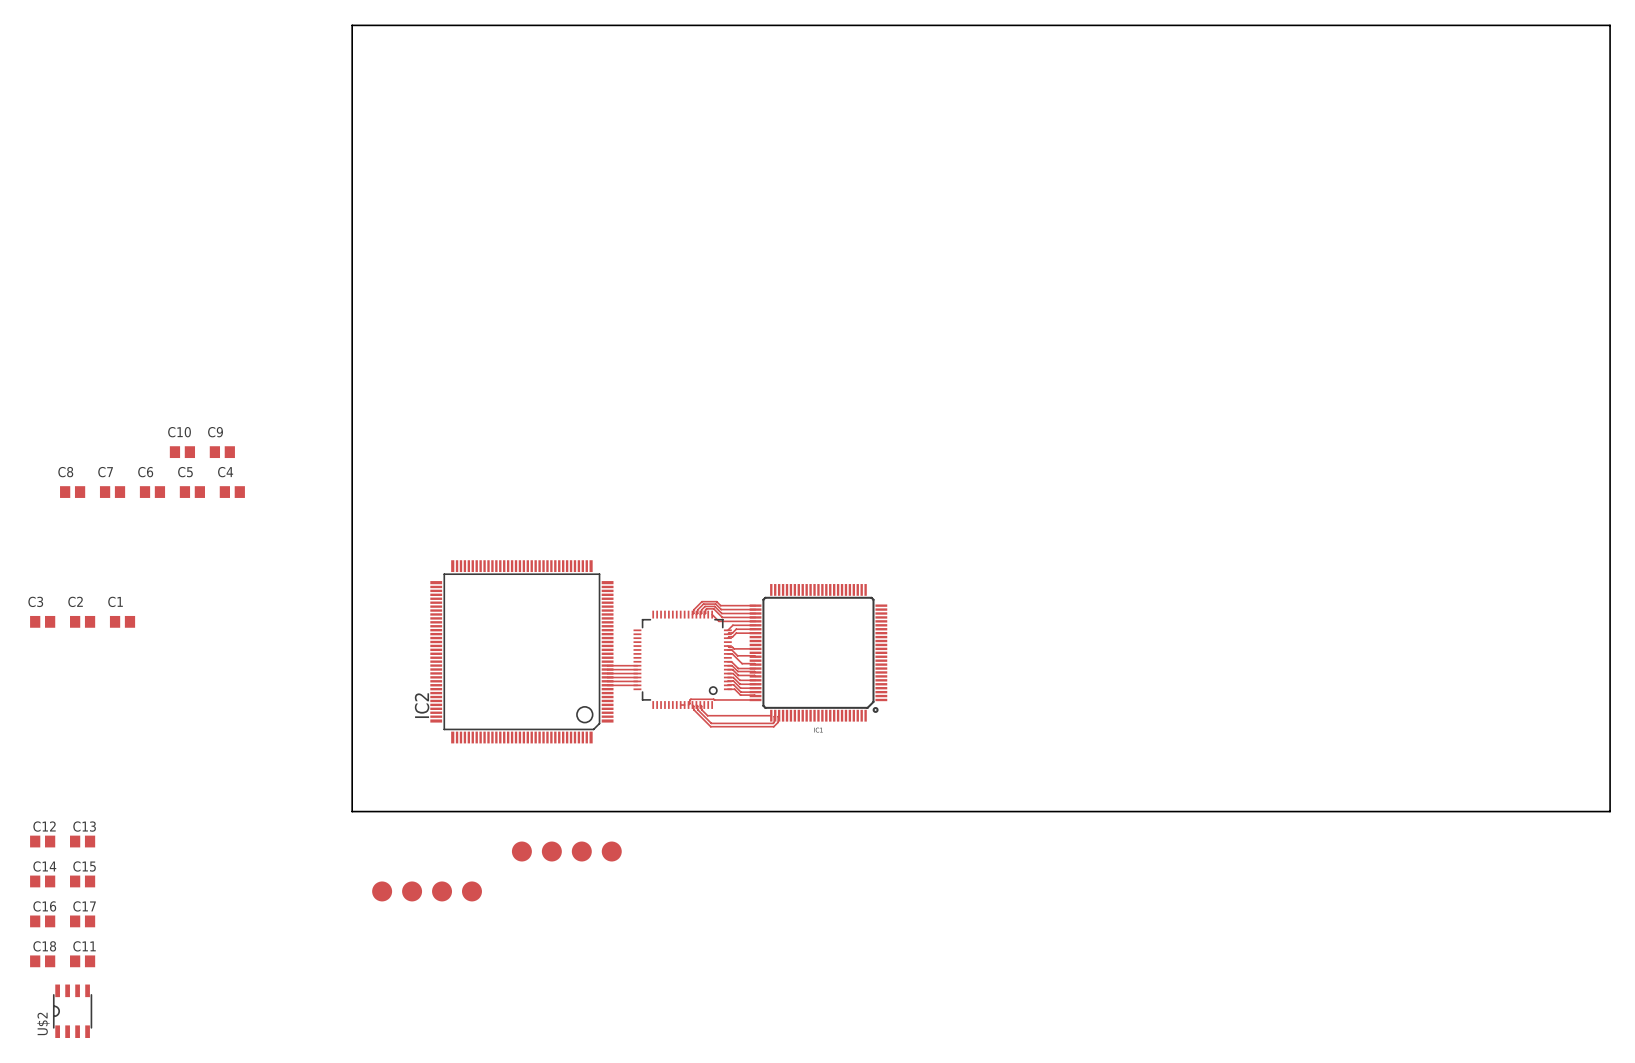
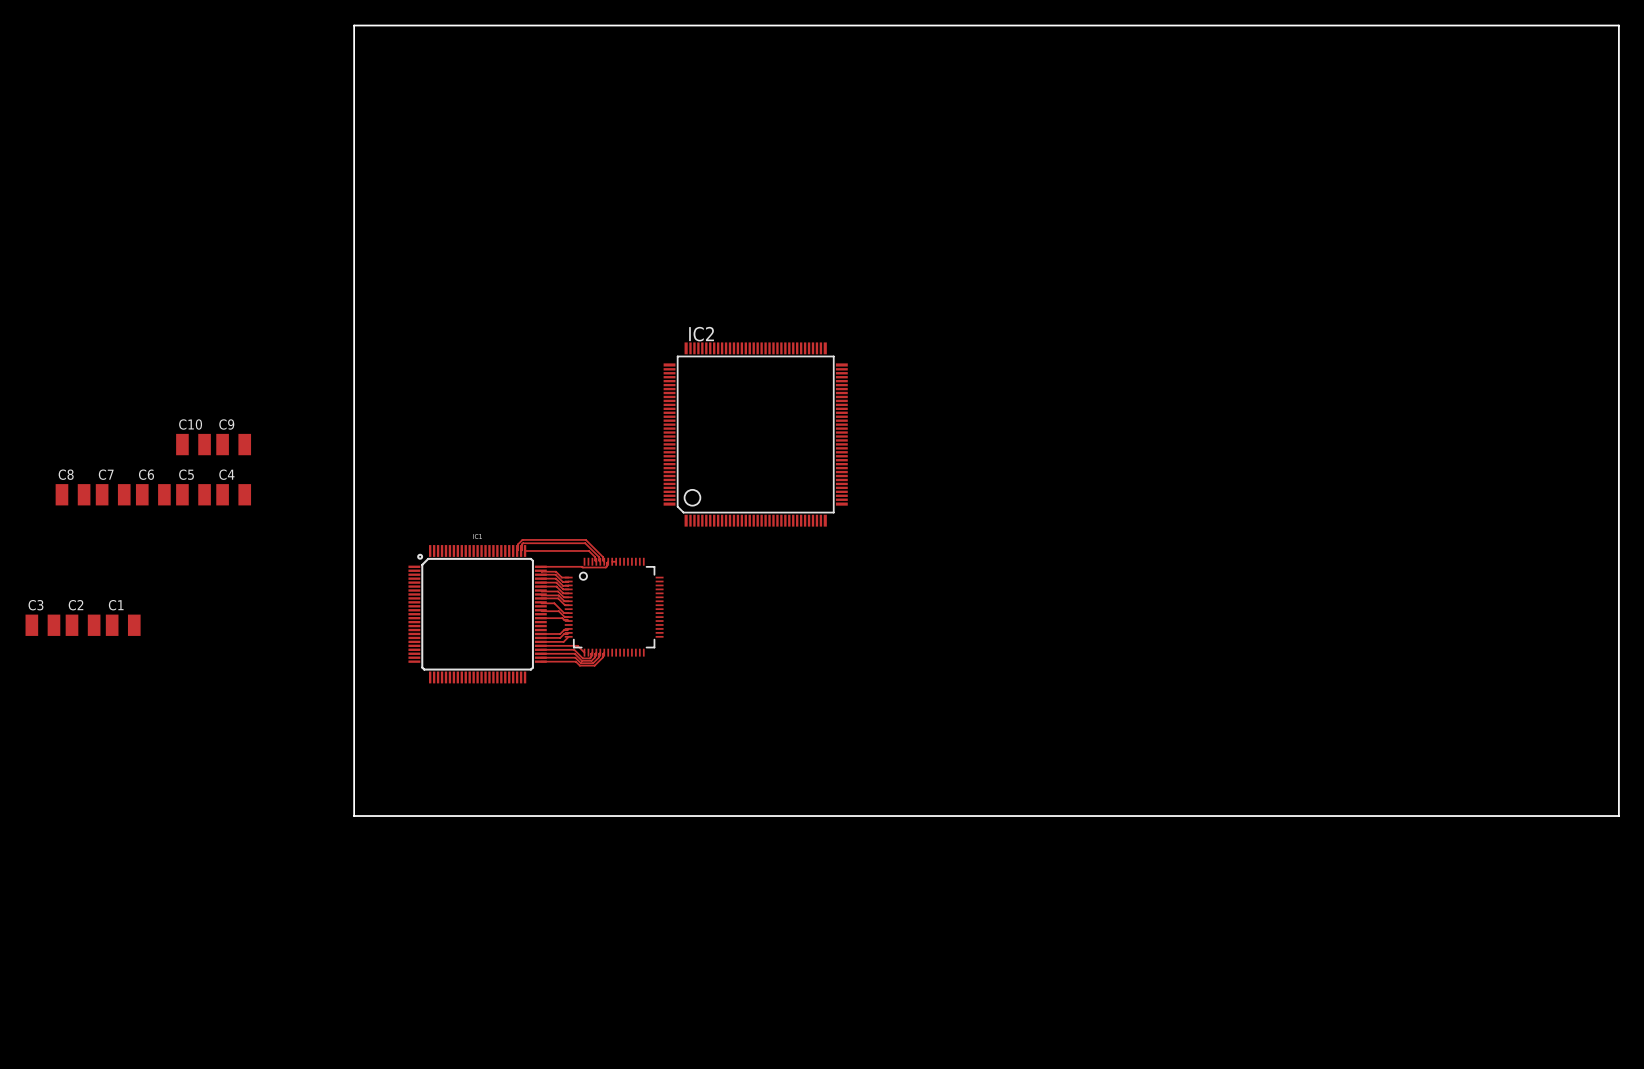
C10 footprint: [169, 446, 196, 459] -> [176, 433, 211, 456]
C9 footprint: [209, 446, 235, 459] -> [216, 433, 252, 456]
C8 footprint: [60, 486, 86, 498] -> [55, 484, 91, 506]
C7 footprint: [99, 486, 126, 498] -> [95, 484, 131, 506]
C6 footprint: [139, 486, 166, 498] -> [135, 484, 171, 506]
C5 footprint: [179, 486, 205, 498] -> [176, 484, 211, 506]
C4 footprint: [219, 486, 245, 498] -> [216, 484, 252, 506]
top track: none -> (517, 550) (518, 544) (522, 539) (585, 539) (602, 557) (604, 561)
top track: none -> (521, 550) (523, 543) (585, 543) (599, 557) (600, 561)
top track: none -> (525, 550) (589, 550) (595, 557) (596, 561)
top track: none -> (608, 561) (605, 567) (540, 566)
top track: none -> (540, 570) (555, 571) (561, 577) (568, 577)
top track: none -> (540, 574) (555, 574) (562, 582) (568, 581)
top track: none -> (540, 578) (555, 578) (563, 585) (568, 585)
top track: none -> (540, 582) (556, 582) (563, 589) (568, 589)
top track: none -> (540, 586) (556, 586) (563, 593) (568, 593)
top track: none -> (540, 590) (558, 591) (563, 597) (568, 597)
top track: none -> (540, 594) (558, 595) (564, 601) (568, 601)
top track: none -> (540, 598) (558, 598) (564, 605) (568, 605)
top track: none -> (540, 602) (554, 603) (564, 613) (568, 613)
top track: (755, 605) (720, 605) (716, 601) (702, 601) (693, 609) (692, 614) -> none
top track: none -> (540, 610) (558, 611) (564, 617) (568, 617)
top track: (755, 609) (721, 609) (715, 604) (703, 604) (697, 609) (696, 614) -> none
top track: (755, 613) (721, 613) (714, 606) (705, 606) (700, 614) -> none
top track: none -> (540, 618) (562, 618) (568, 621)
top track: (704, 614) (706, 608) (713, 608) (722, 617) (755, 617) -> none
top track: (712, 614) (718, 621) (755, 621) -> none
C3 footprint: [30, 615, 56, 628] -> [25, 614, 61, 636]
C2 footprint: [70, 615, 96, 628] -> [65, 614, 101, 636]
C1 footprint: [109, 615, 136, 628] -> [105, 614, 141, 636]
top track: none -> (568, 628) (560, 633) (540, 633)
top track: (755, 625) (732, 625) (727, 630) -> none
top track: none -> (568, 632) (560, 637) (540, 637)
top track: (755, 629) (736, 629) (727, 634) -> none
top track: none -> (568, 636) (563, 641) (540, 641)
top track: (755, 633) (736, 633) (727, 638) -> none
top track: none -> (540, 645) (577, 645) (584, 652)
top track: none -> (540, 649) (574, 649) (582, 658) (590, 658) (592, 652)
top track: (727, 646) (734, 648) (755, 648) -> none
top track: none -> (596, 652) (591, 660) (581, 660) (574, 653) (540, 653)
top track: none -> (600, 652) (599, 657) (593, 663) (580, 663) (575, 657) (540, 657)
top track: none -> (604, 652) (602, 657) (594, 665) (579, 665) (575, 661) (540, 661)
top track: (727, 649) (731, 649) (737, 655) (755, 656) -> none
IC2 rotation: 0° (521, 651) -> 90° clockwise (755, 434)
IC2 position: (521, 651) -> (755, 434)
part rotation: 0° (818, 652) -> 180° (477, 614)
part position: (818, 652) -> (477, 614)
top track: (727, 653) (732, 653) (742, 663) (755, 664) -> none
part rotation: 0° (682, 659) -> 180° (614, 607)
part position: (682, 659) -> (614, 607)
top track: (727, 661) (731, 661) (738, 668) (755, 668) -> none
top track: (607, 665) (637, 665) -> none
top track: (727, 665) (732, 665) (737, 671) (755, 672) -> none
top track: (607, 669) (637, 669) -> none
top track: (727, 669) (732, 669) (738, 675) (755, 676) -> none
top track: (607, 673) (637, 673) -> none
top track: (727, 673) (733, 673) (739, 680) (755, 680) -> none
top track: (607, 677) (637, 677) -> none
top track: (727, 677) (733, 677) (740, 684) (755, 684) -> none
top track: (607, 681) (637, 681) -> none
top track: (727, 681) (733, 680) (740, 688) (755, 688) -> none
top track: (607, 685) (637, 685) -> none
top track: (727, 685) (733, 684) (740, 692) (755, 692) -> none
top track: (727, 689) (734, 689) (740, 695) (755, 696) -> none
top track: (755, 699) (690, 699) (688, 705) -> none
top track: (680, 705) (684, 705) -> (612, 561) (616, 561)
top track: (692, 705) (693, 709) (710, 726) (773, 726) (778, 722) (779, 715) -> none
top track: (696, 705) (697, 709) (711, 723) (773, 723) (775, 715) -> none
top track: (700, 705) (701, 709) (707, 715) (771, 715) -> none
C12: (42, 841) -> none
C13: (82, 841) -> none
part: (521, 851) -> none
part: (551, 851) -> none
part: (581, 851) -> none
part: (611, 851) -> none
C14: (42, 881) -> none
C15: (82, 881) -> none
part: (382, 891) -> none
part: (412, 891) -> none
part: (442, 891) -> none
part: (471, 891) -> none
C16: (42, 921) -> none
C17: (82, 921) -> none
C18: (42, 961) -> none
C11: (82, 961) -> none
U$2: (72, 1011) -> none

